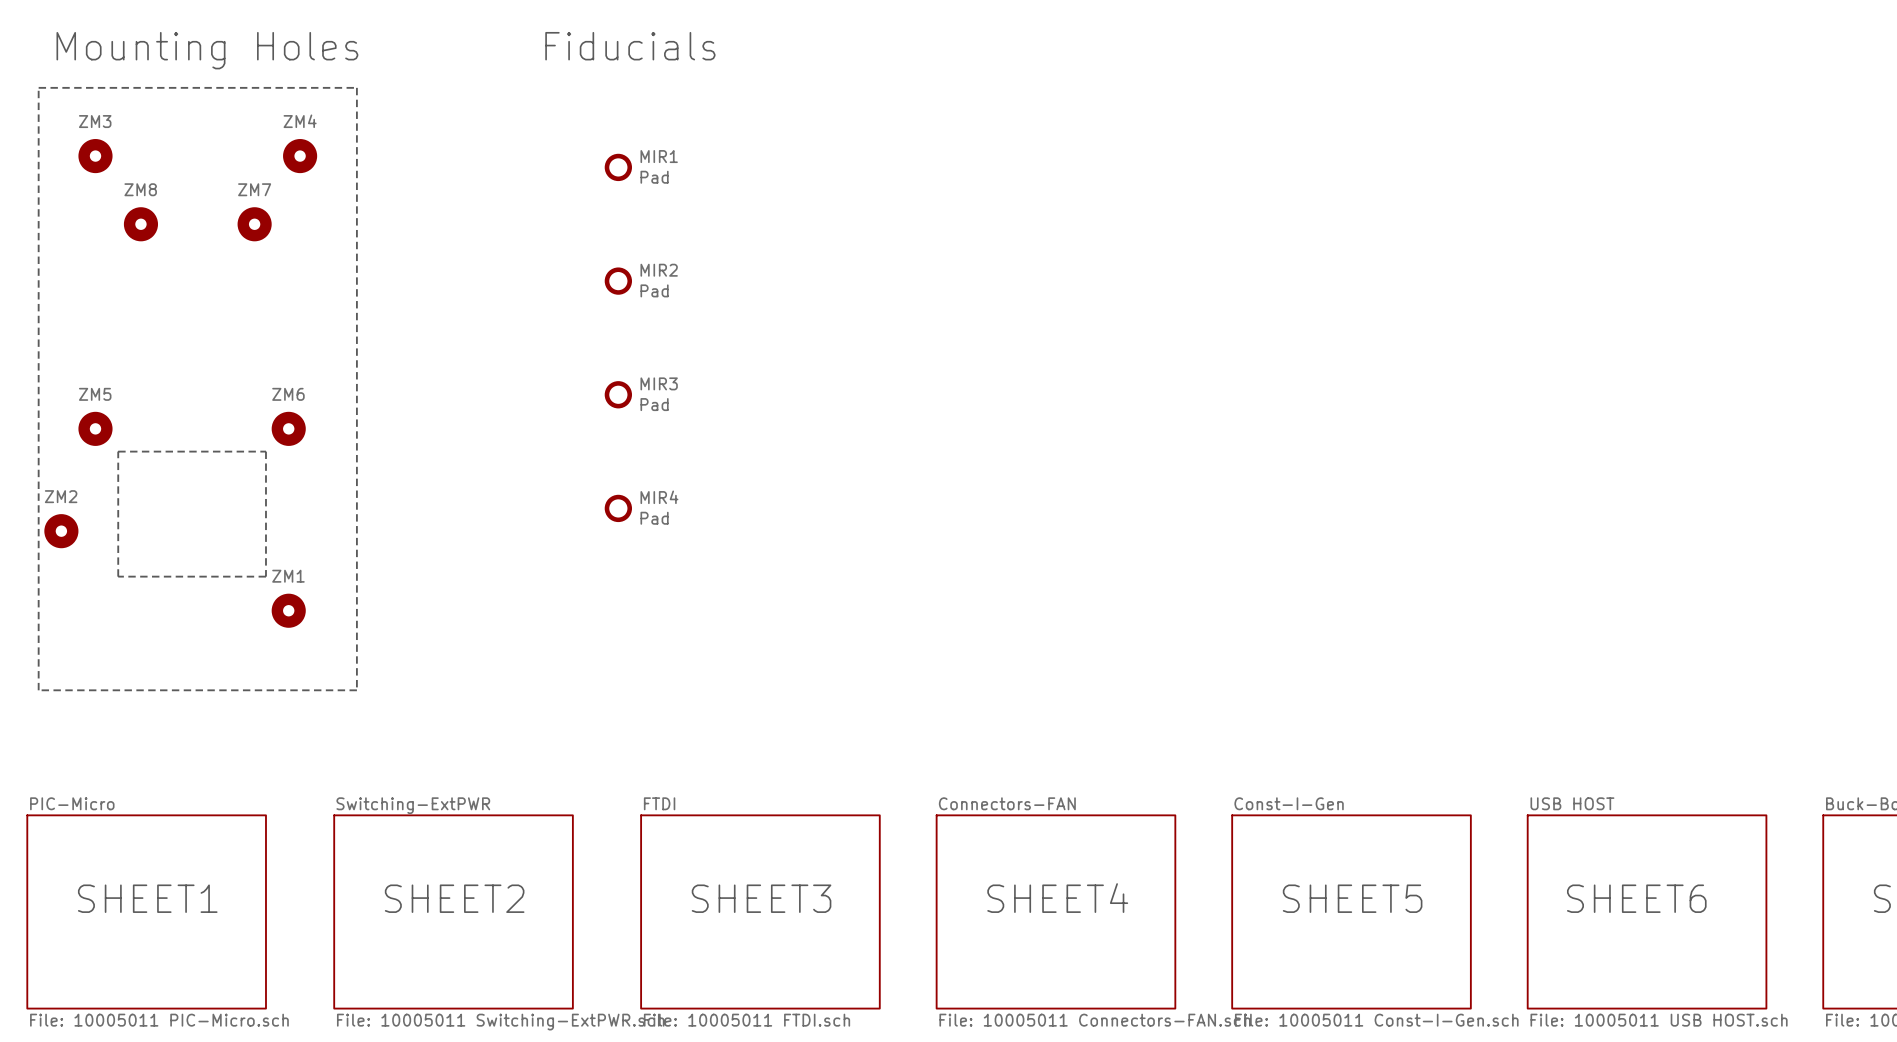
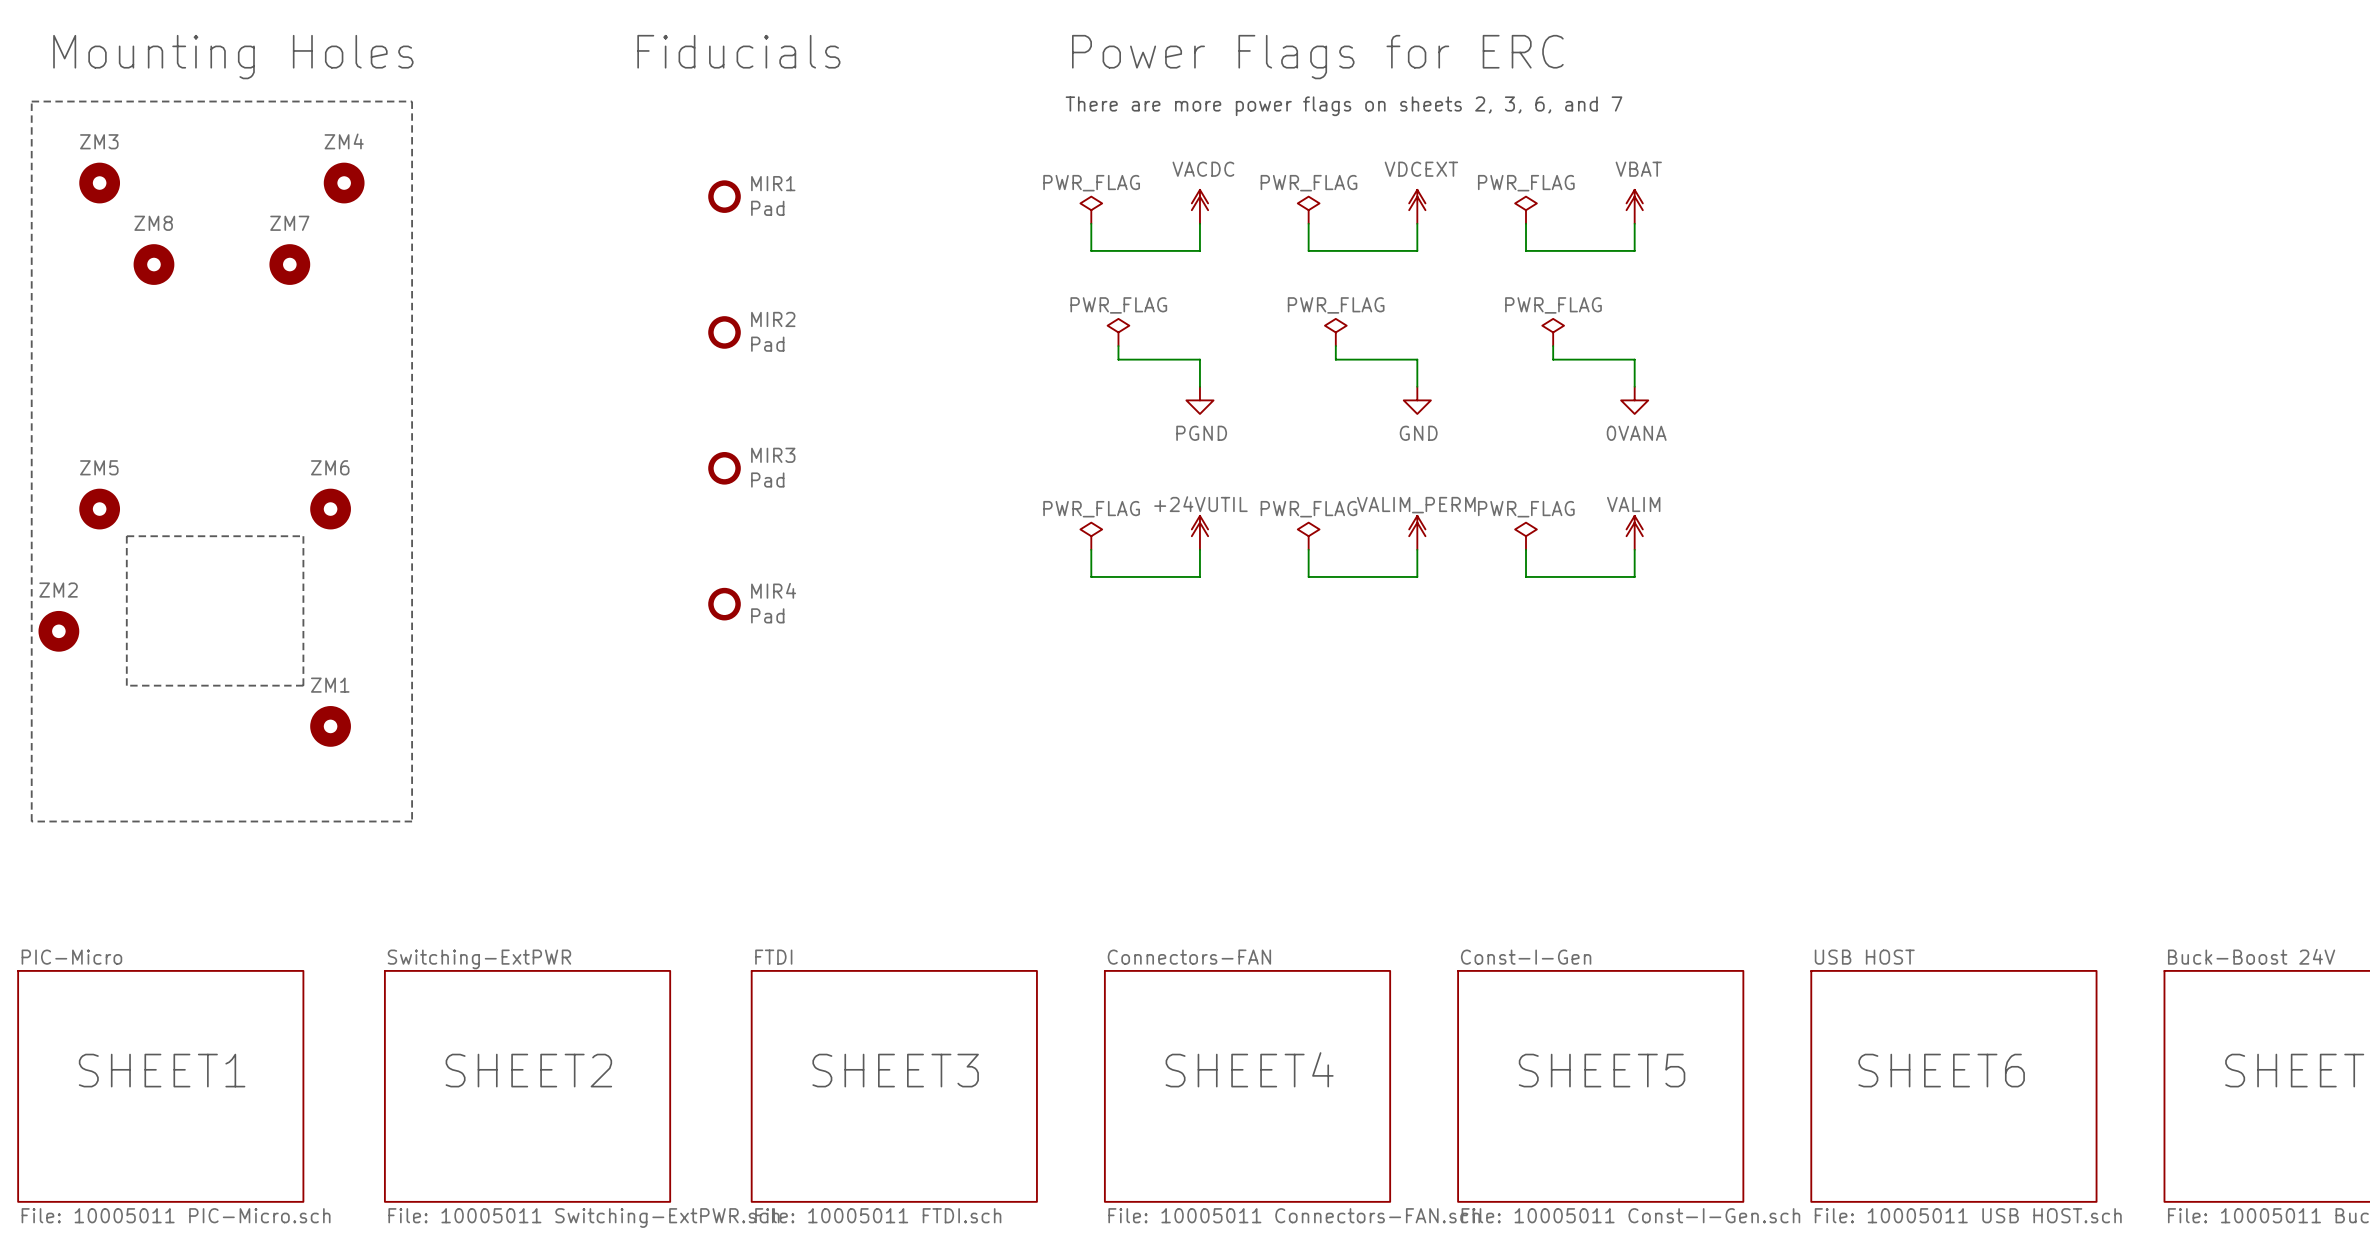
text: none -> Power Flags for ERC (1317, 57)
text: none -> There are more power flags on sheets 2, 3, 6, and 7 (1344, 106)
power symbol: none -> VACDC (1199, 206)
power symbol: none -> VDCEXT (1417, 206)
power symbol: none -> VBAT (1634, 206)
power symbol: none -> PWR_FLAG (1091, 210)
power symbol: none -> PWR_FLAG (1308, 210)
power symbol: none -> PWR_FLAG (1526, 210)
wire: none -> (1091, 223) (1091, 250) (1199, 250) (1199, 223)
wire: none -> (1308, 223) (1308, 250) (1417, 250) (1417, 223)
wire: none -> (1526, 223) (1526, 250) (1634, 250) (1634, 223)
power symbol: none -> PWR_FLAG (1118, 332)
power symbol: none -> PWR_FLAG (1335, 332)
power symbol: none -> PWR_FLAG (1553, 332)
wire: none -> (1118, 346) (1118, 359) (1199, 359) (1199, 386)
wire: none -> (1335, 346) (1335, 359) (1417, 359) (1417, 386)
wire: none -> (1553, 346) (1553, 359) (1634, 359) (1634, 386)
power symbol: none -> PGND (1199, 400)
power symbol: none -> GND (1417, 400)
power symbol: none -> 0VANA (1634, 400)
power symbol: none -> +24VUTIL (1199, 532)
power symbol: none -> VALIM_PERM (1417, 532)
power symbol: none -> VALIM (1634, 532)
power symbol: none -> PWR_FLAG (1091, 536)
power symbol: none -> PWR_FLAG (1308, 536)
power symbol: none -> PWR_FLAG (1526, 536)
wire: none -> (1091, 549) (1091, 576) (1199, 576) (1199, 549)
wire: none -> (1308, 549) (1308, 576) (1417, 576) (1417, 549)
wire: none -> (1526, 549) (1526, 576) (1634, 576) (1634, 549)

